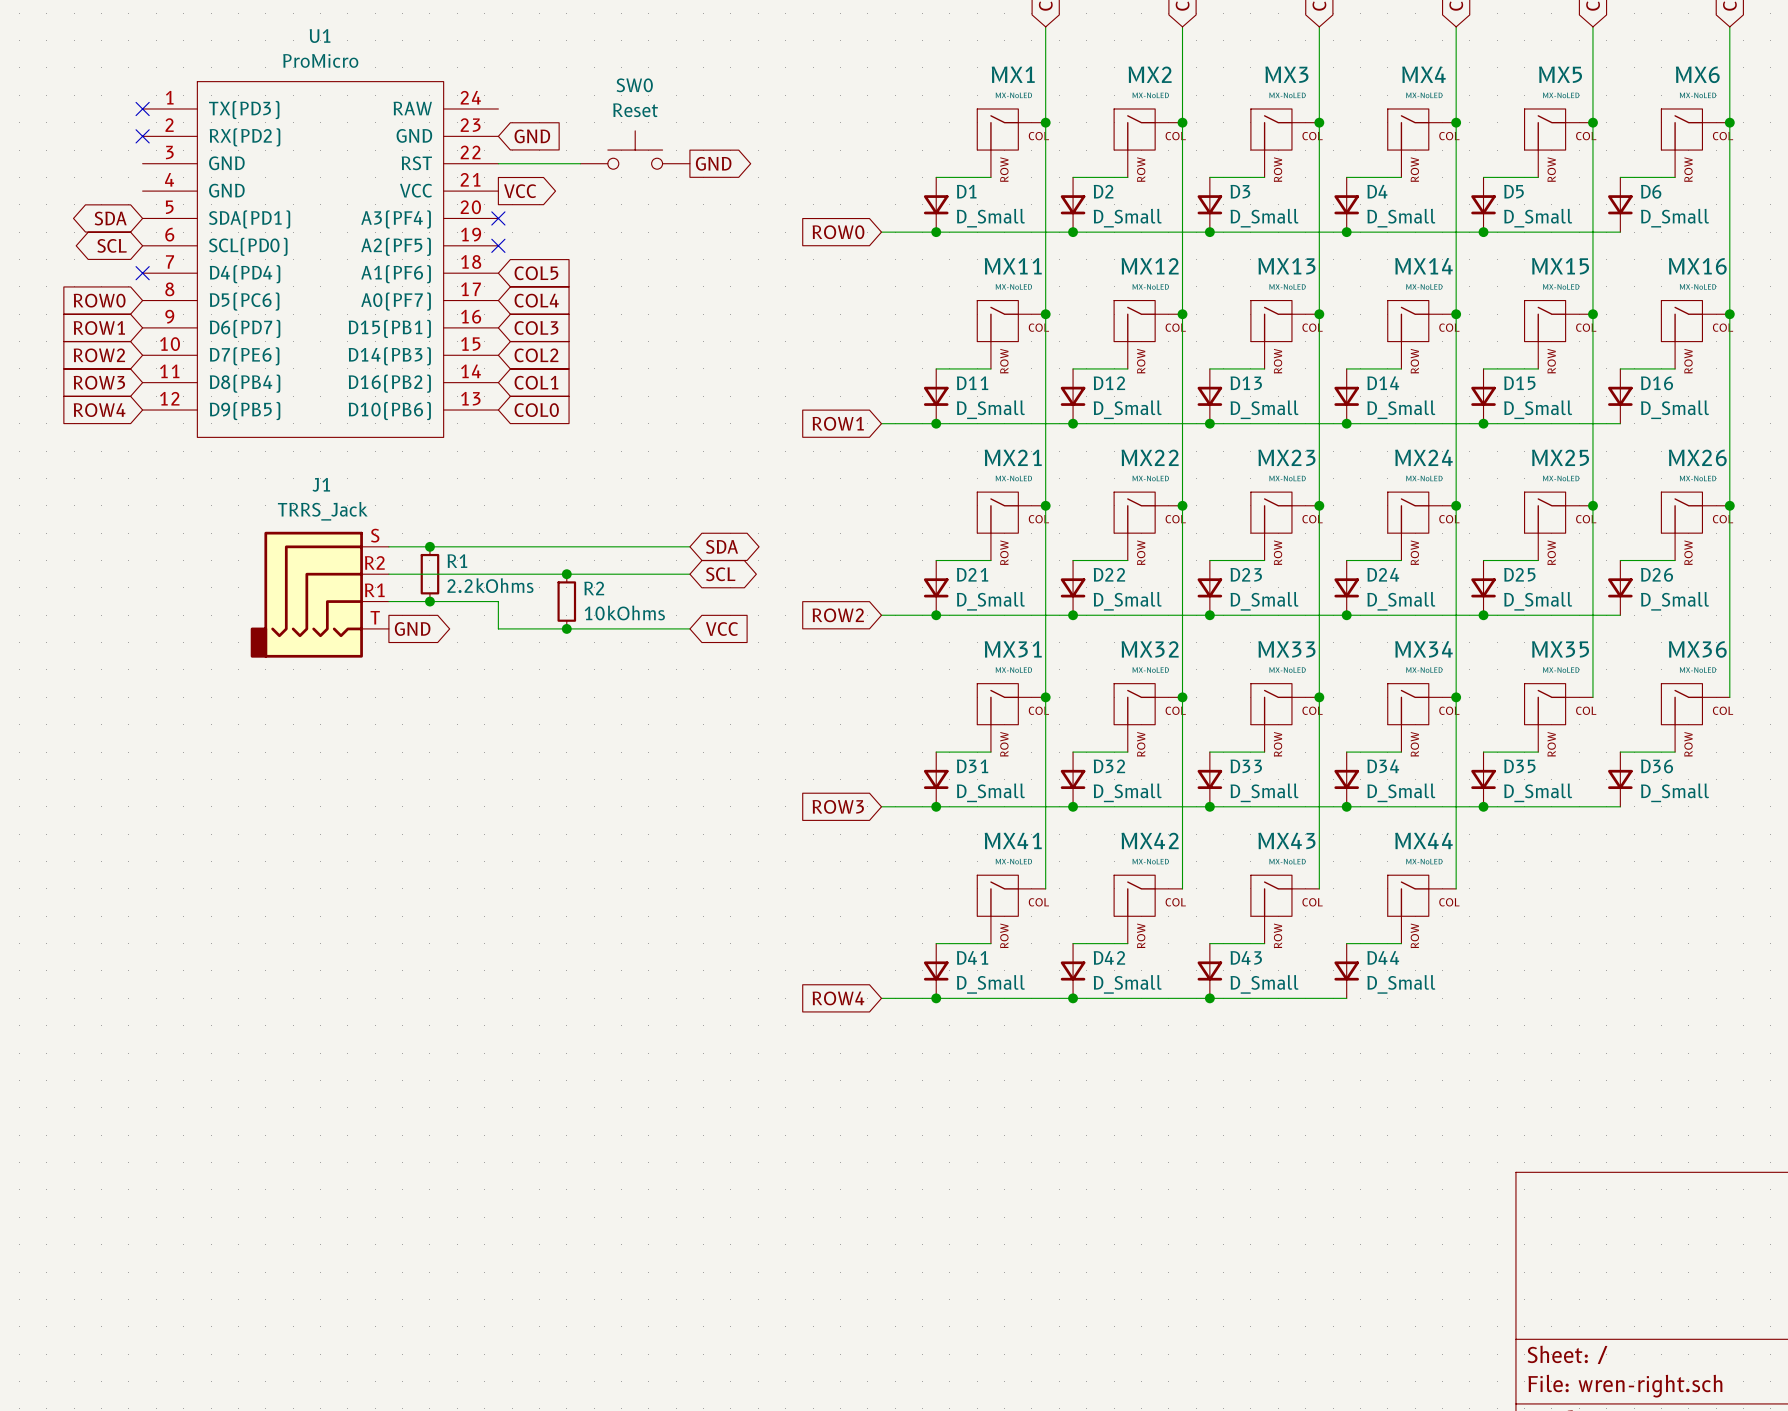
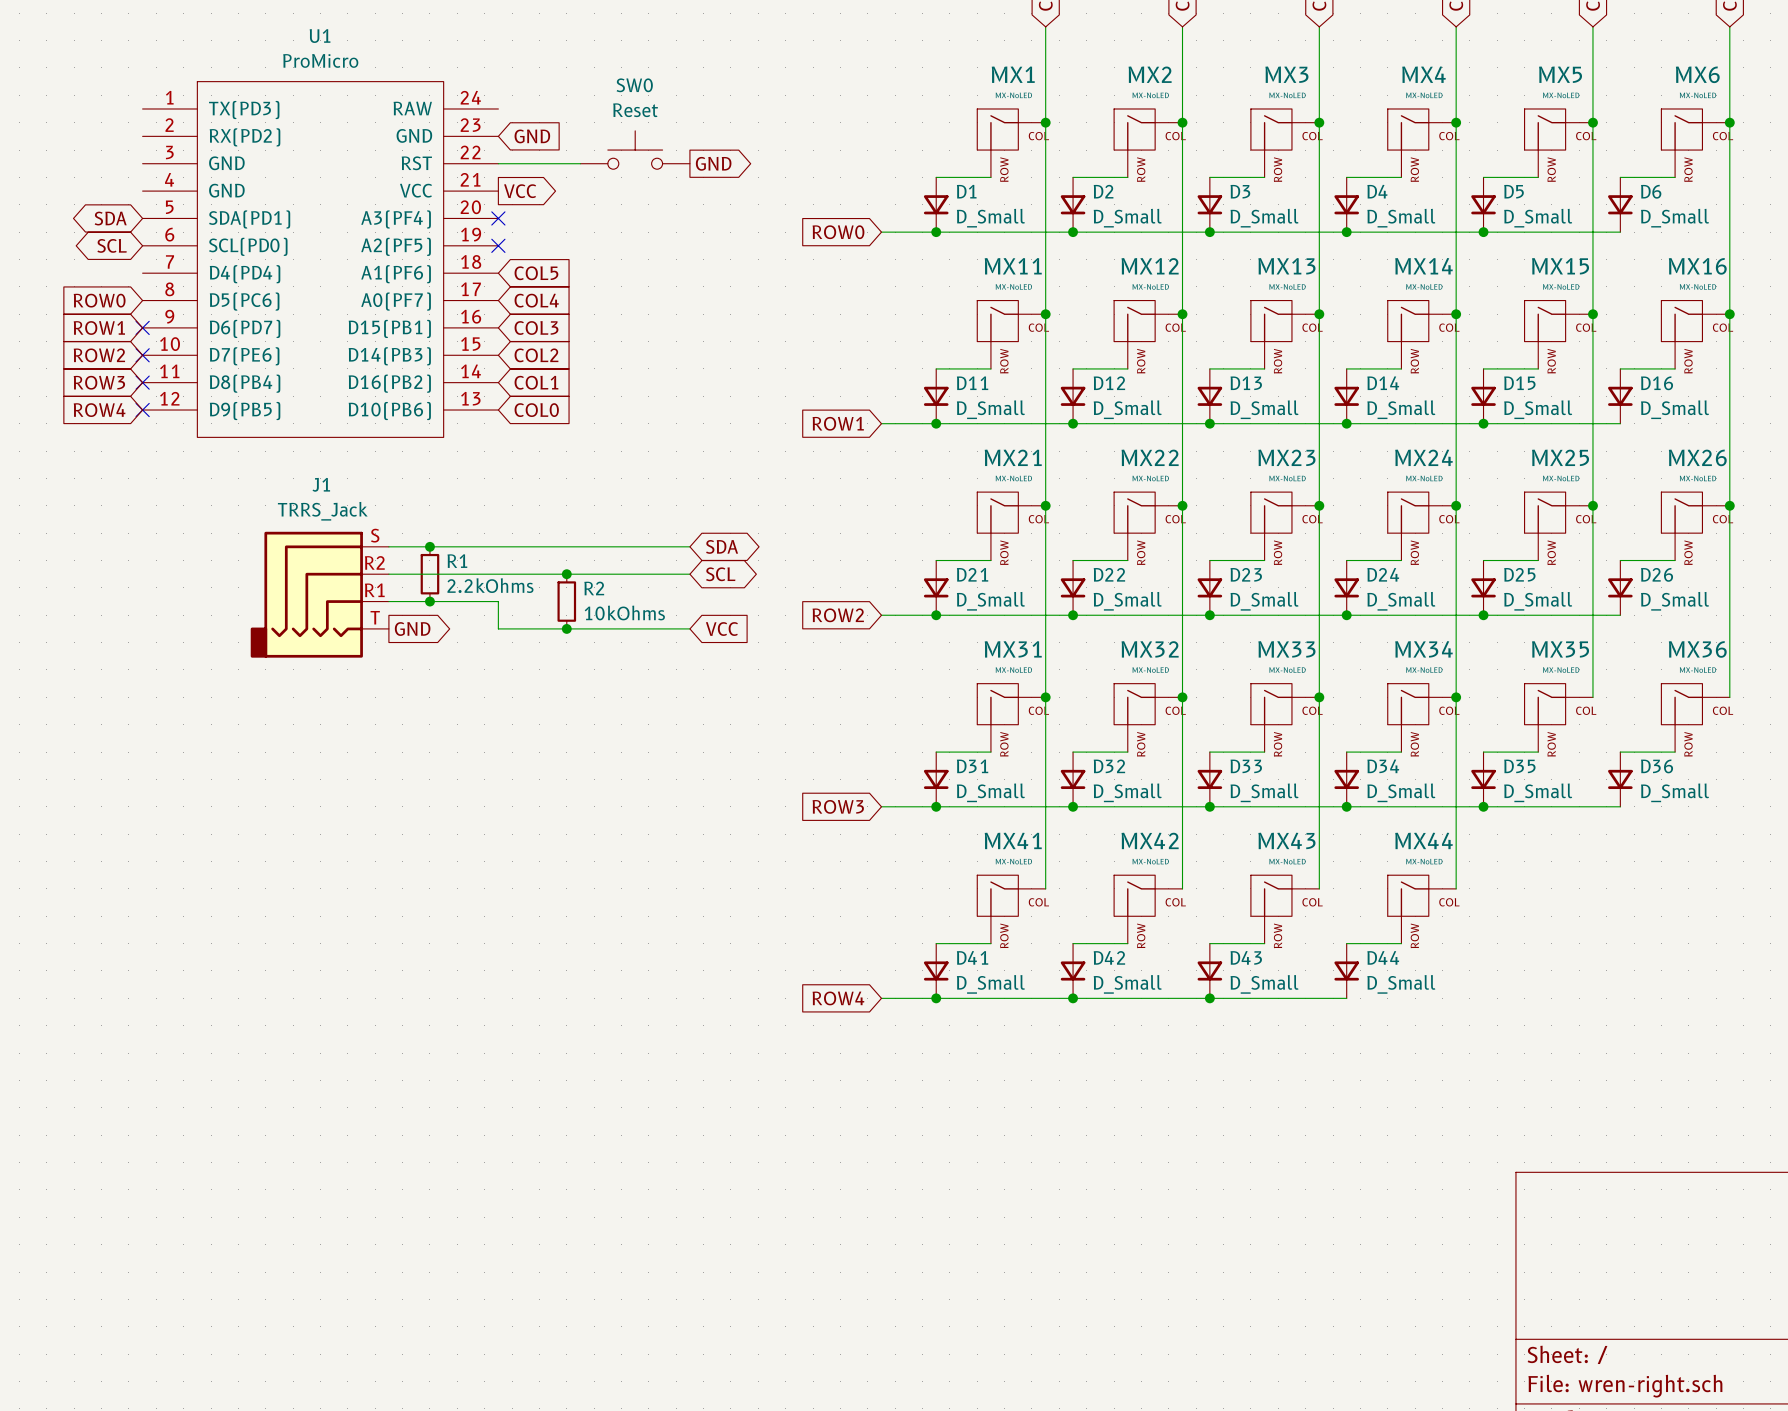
no-connect mark: (142, 108) -> none
no-connect mark: (142, 136) -> none
no-connect mark: (142, 273) -> none
no-connect mark: none -> (142, 327)
no-connect mark: none -> (142, 355)
no-connect mark: none -> (142, 382)
no-connect mark: none -> (142, 410)

